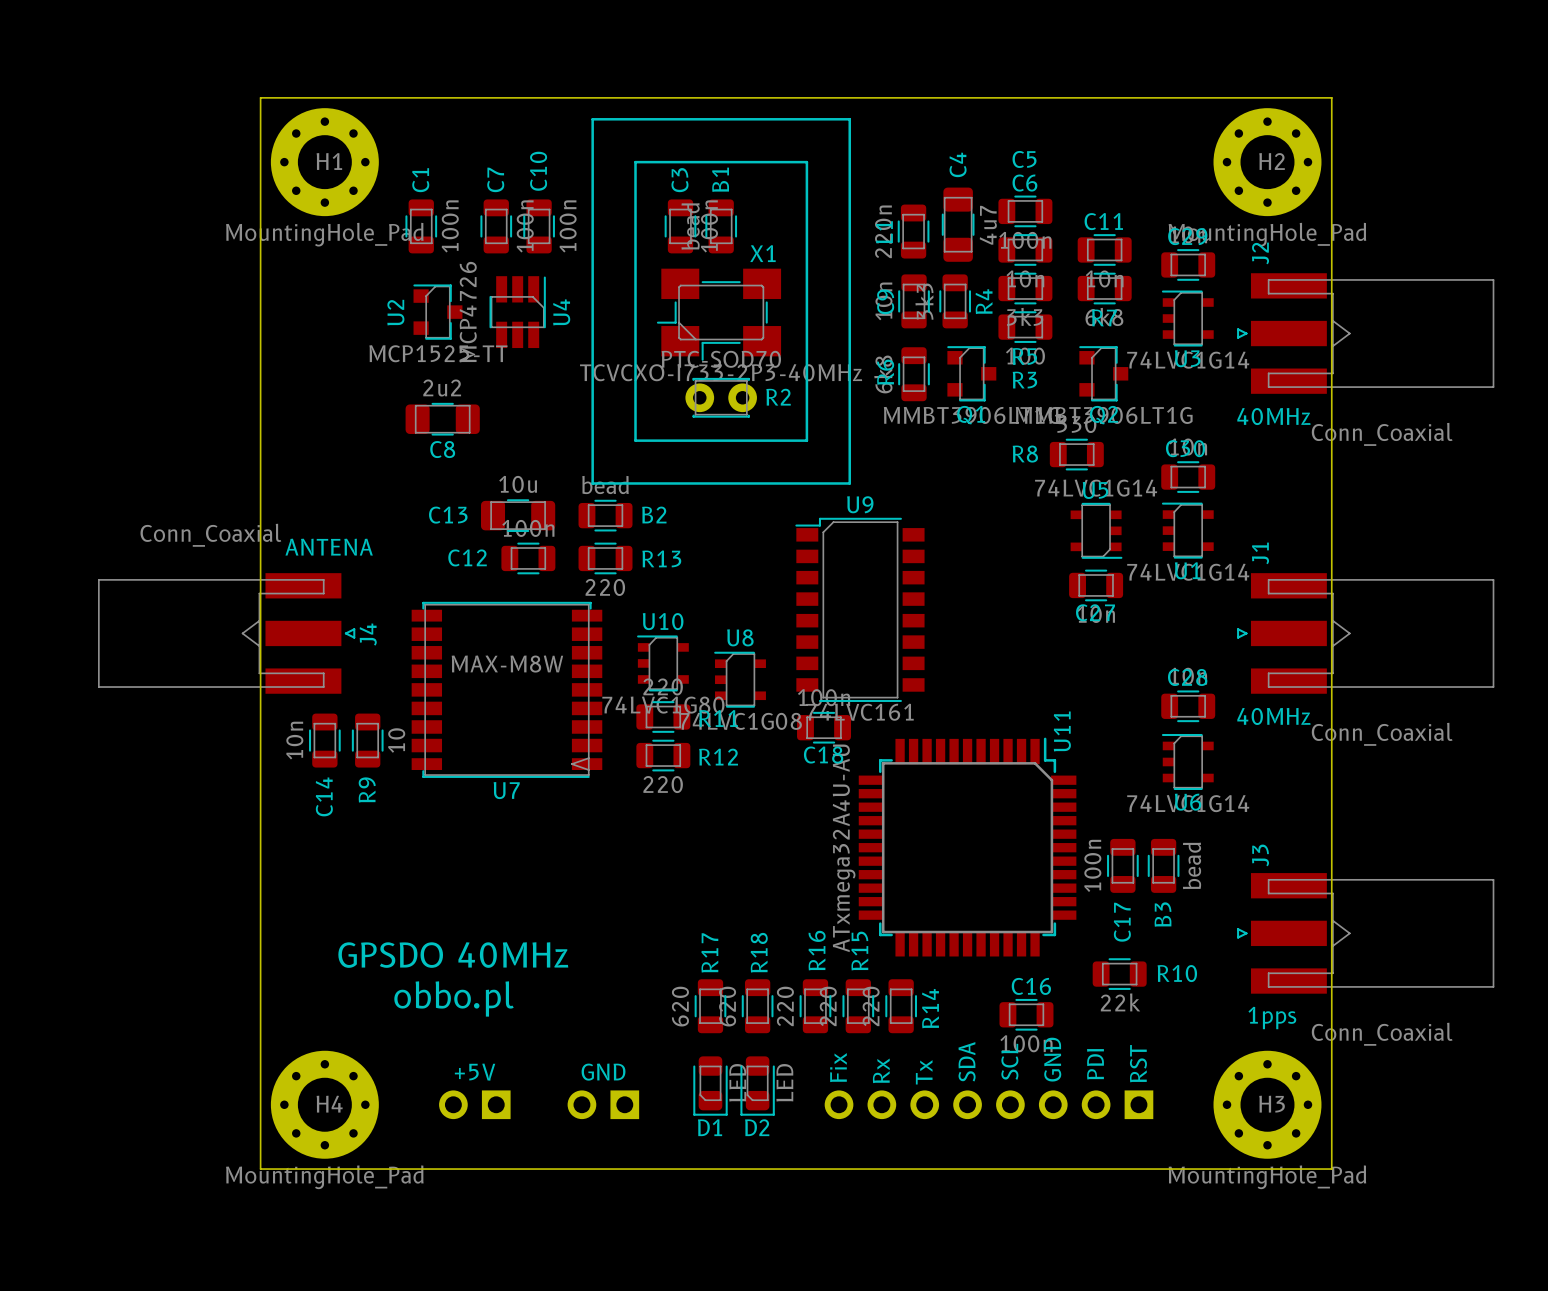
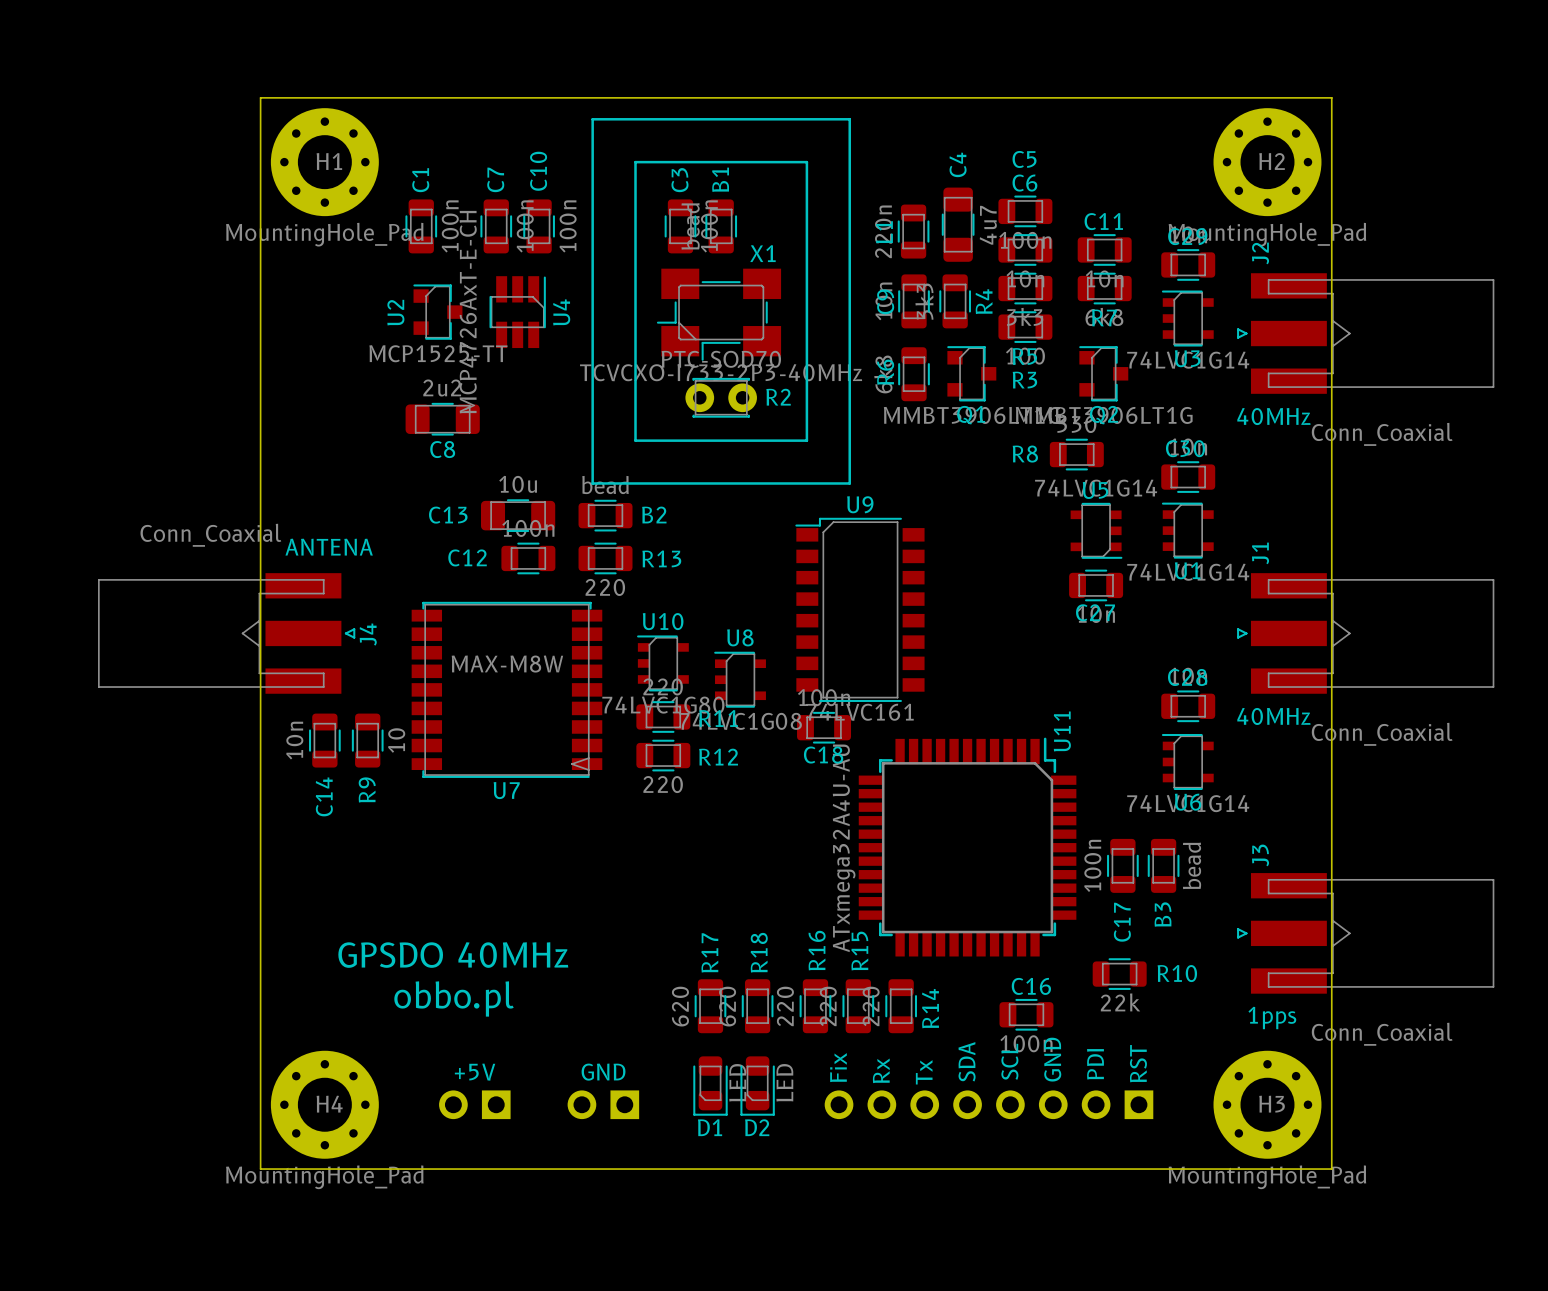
U4 value: MCP4726 (468, 312) -> MCP4726AxT-E-CH (468, 312)

